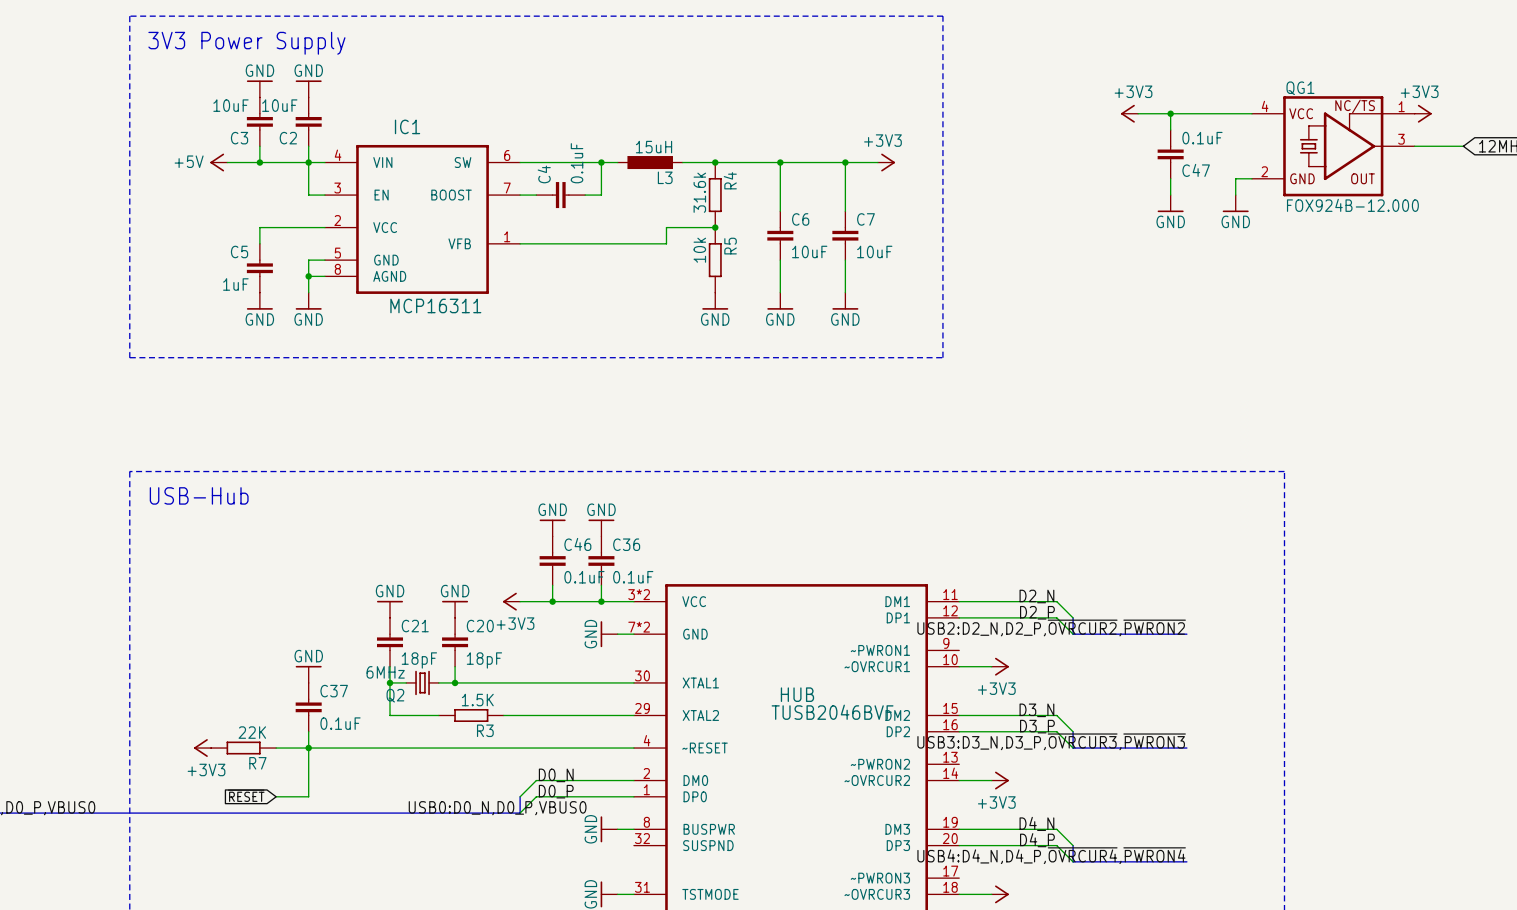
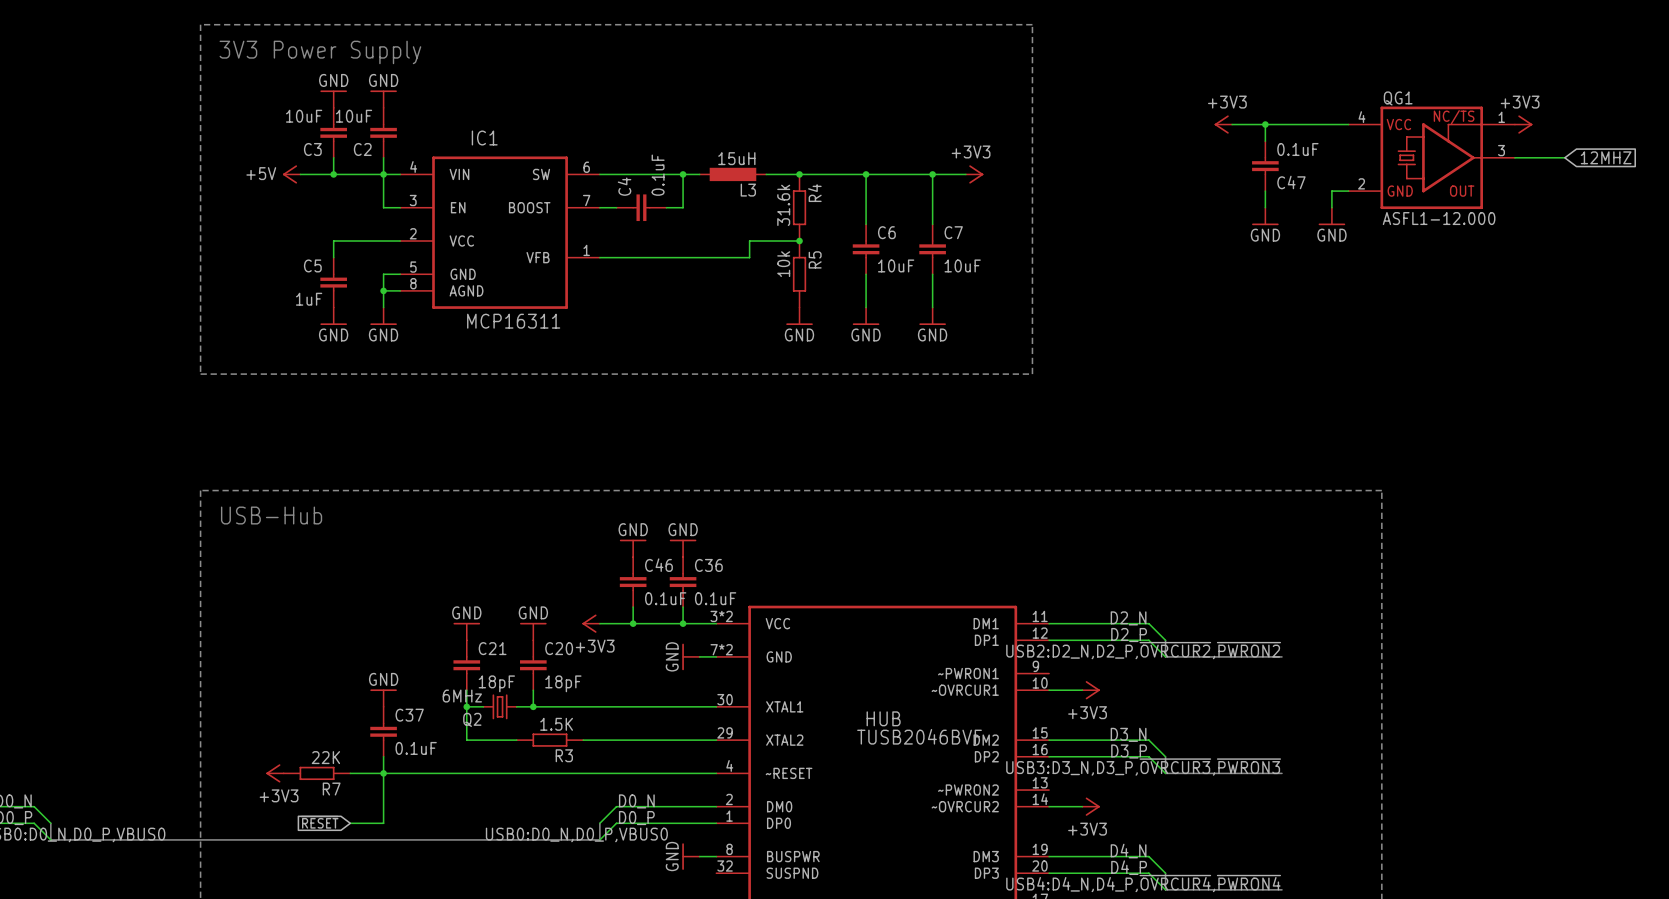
QG1 value: FOX924B-12.000 (1352, 205) -> ASFL1-12.000 (1439, 218)

